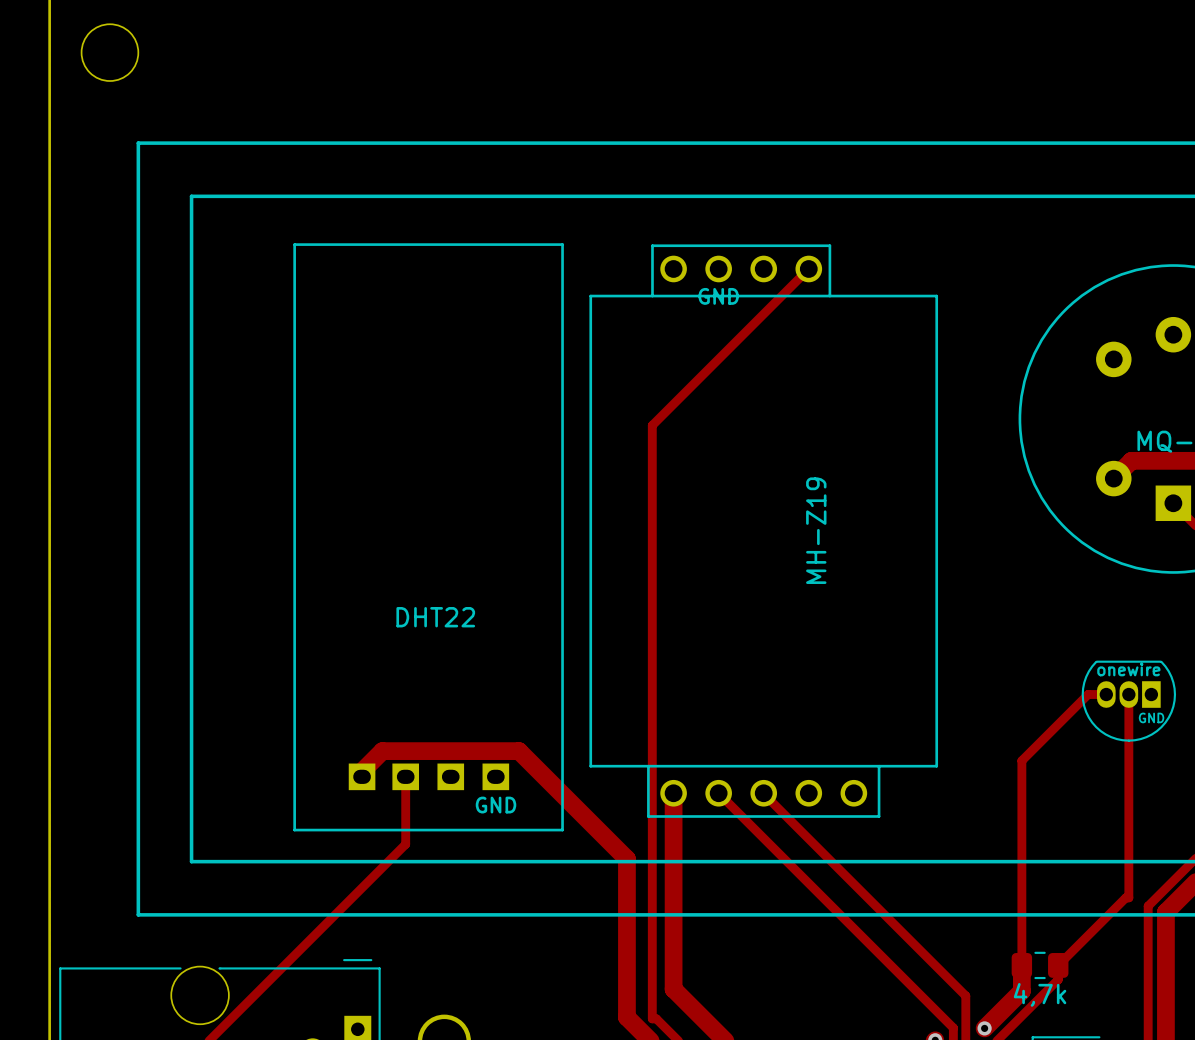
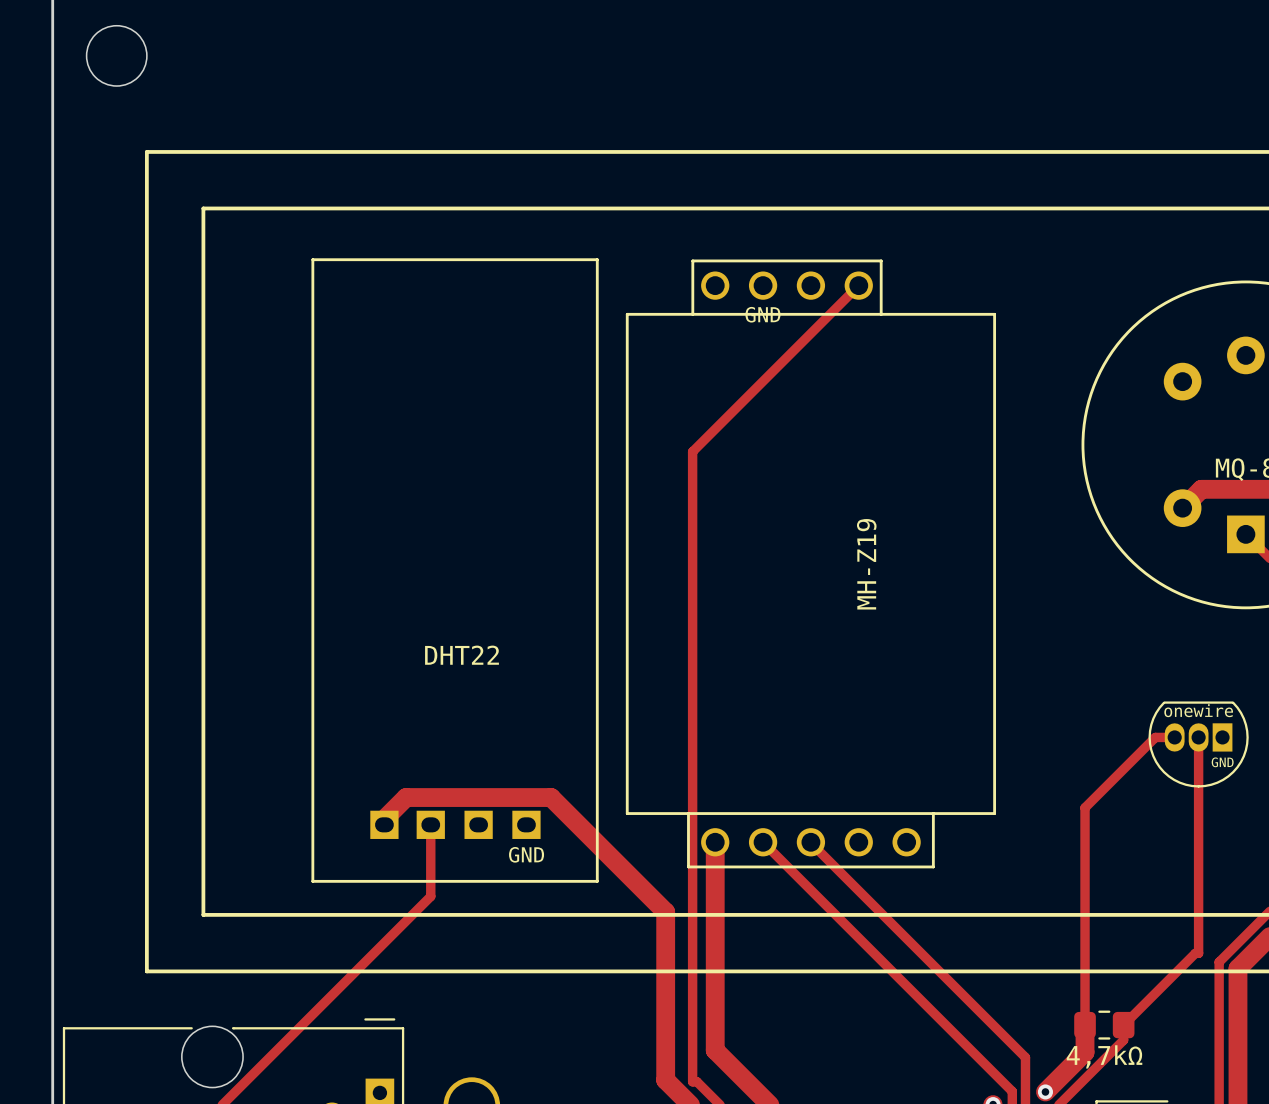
part value: 4,7k (1040, 994) -> 4,7kΩ (1104, 1056)

